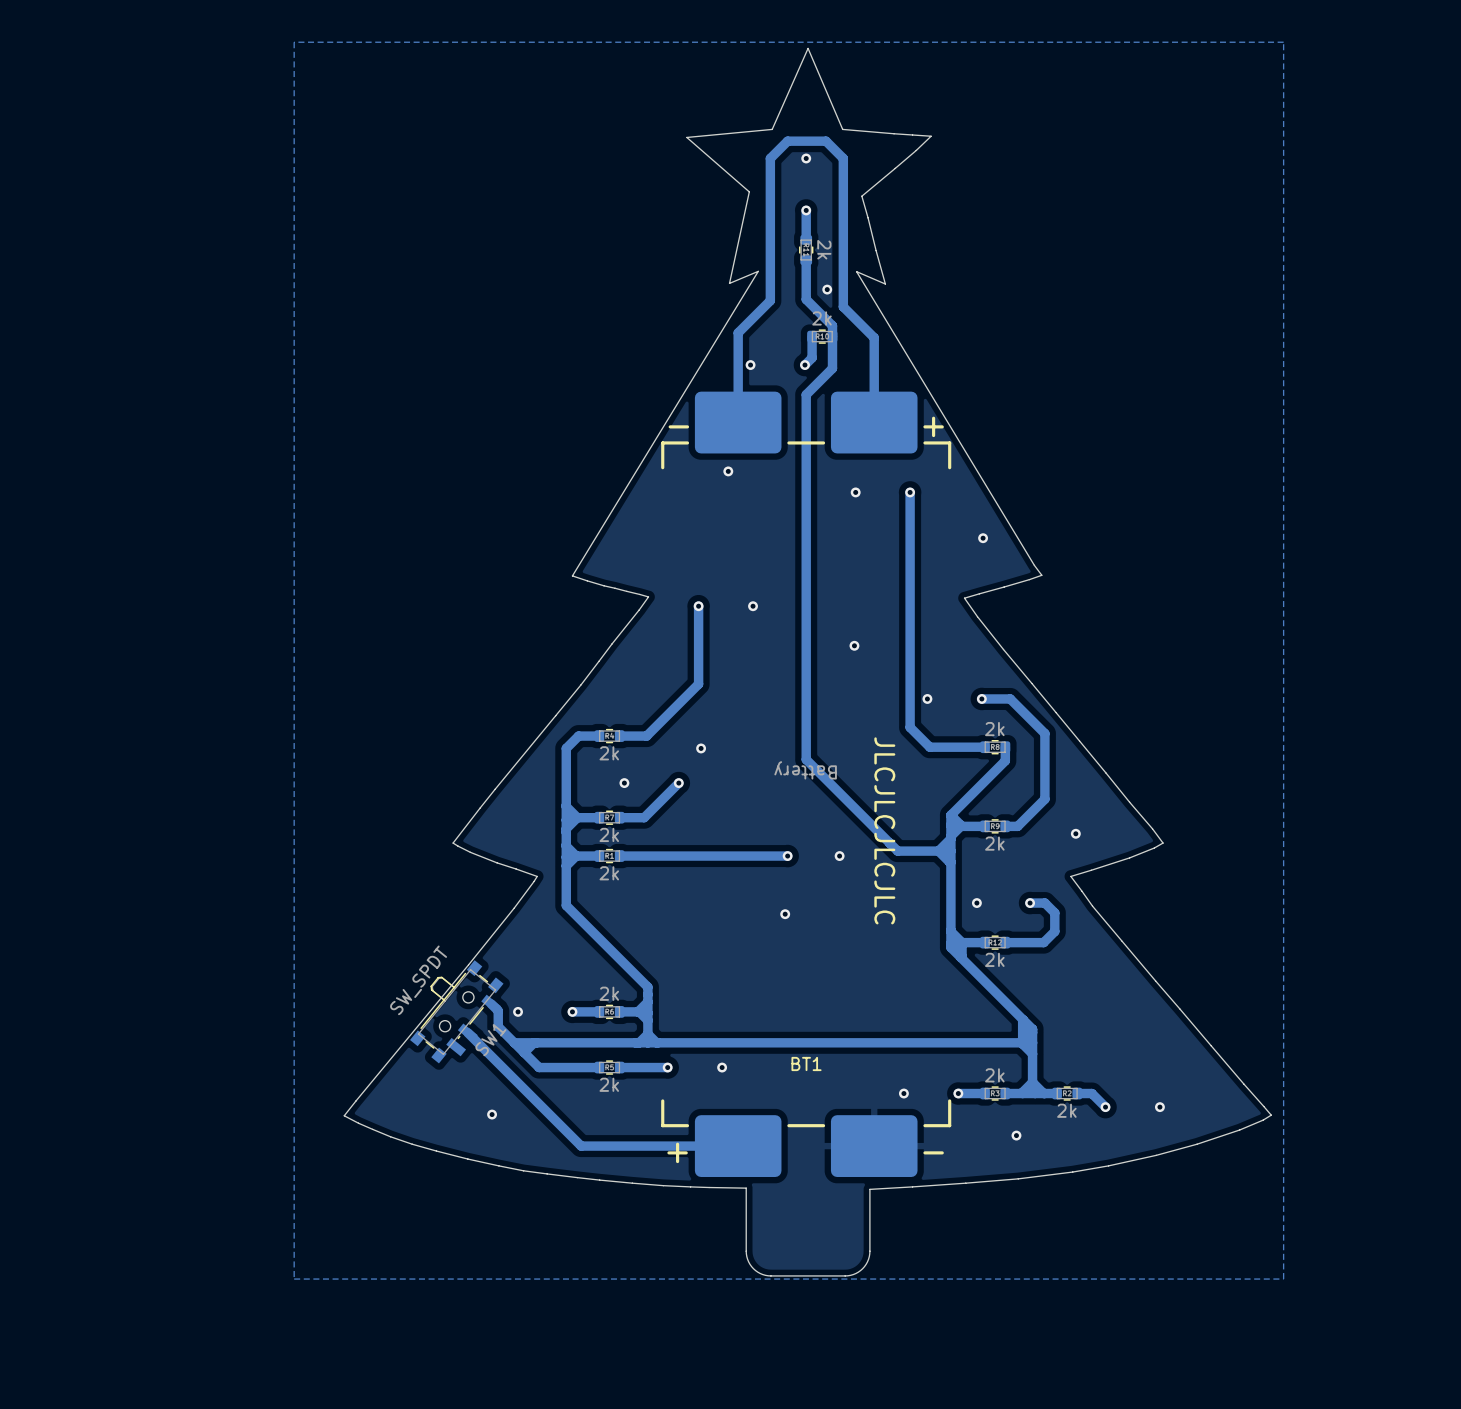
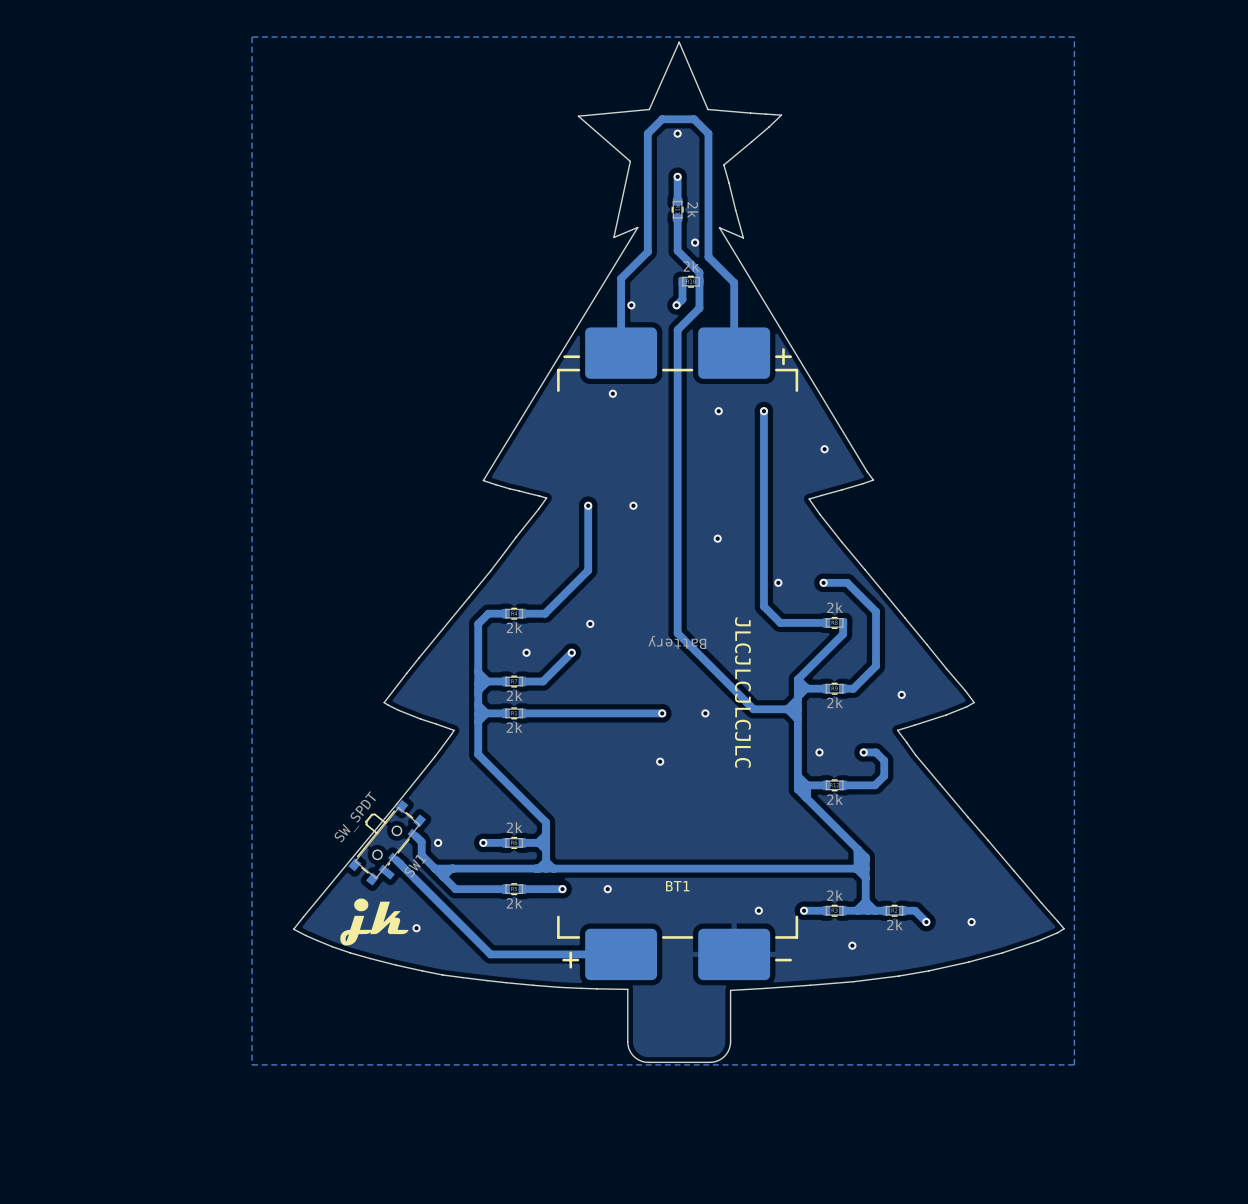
drawing: none -> [340, 898, 409, 946]

